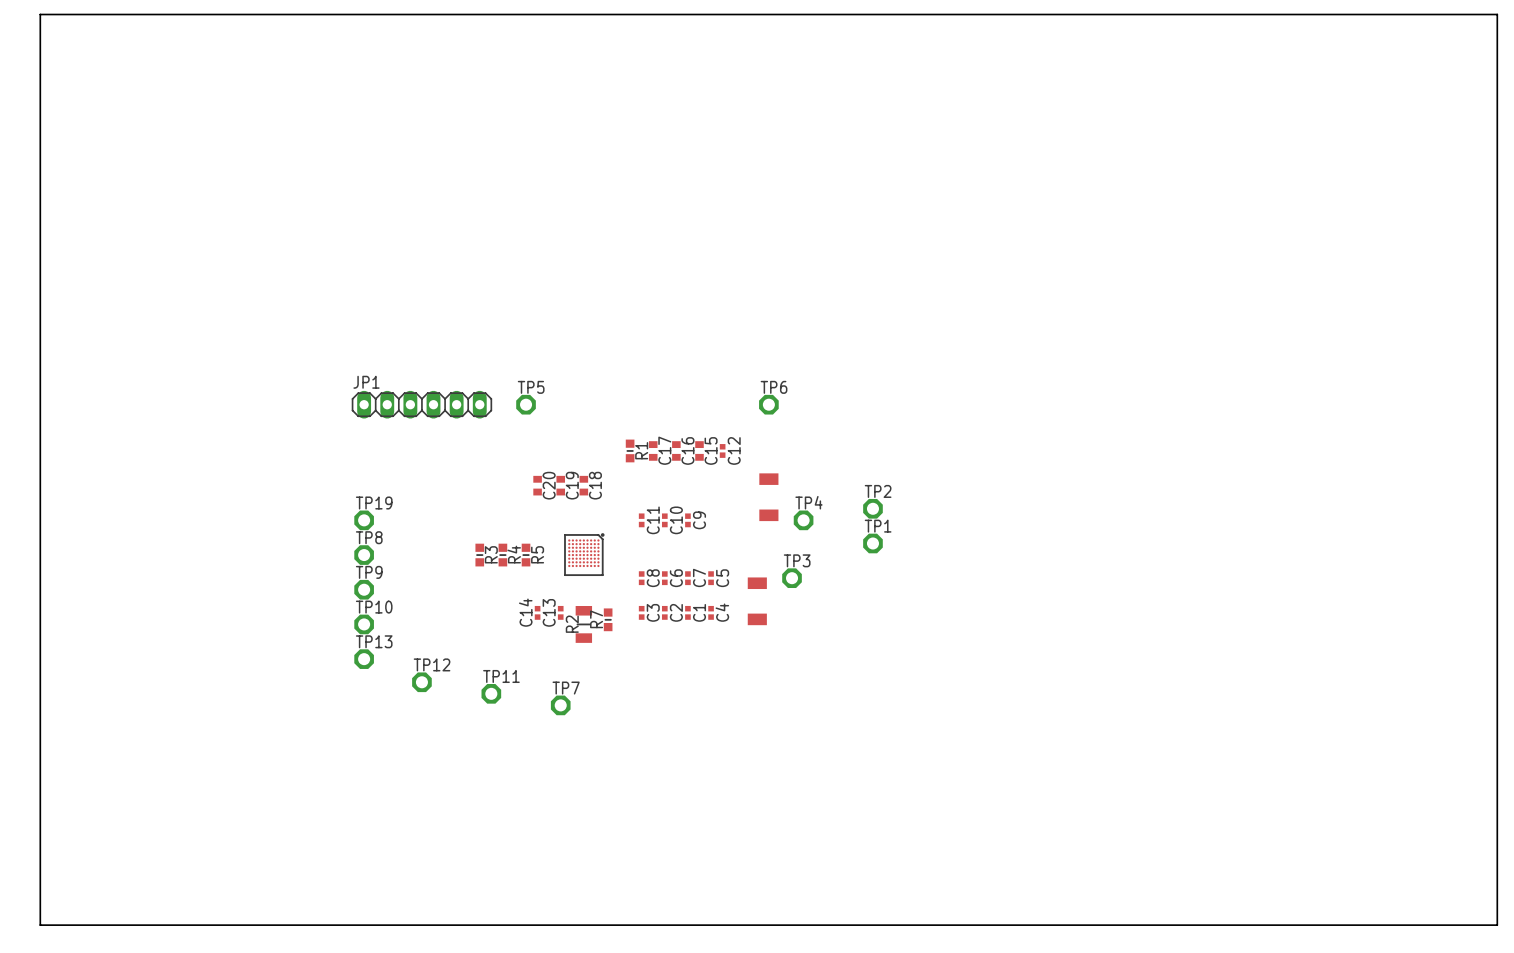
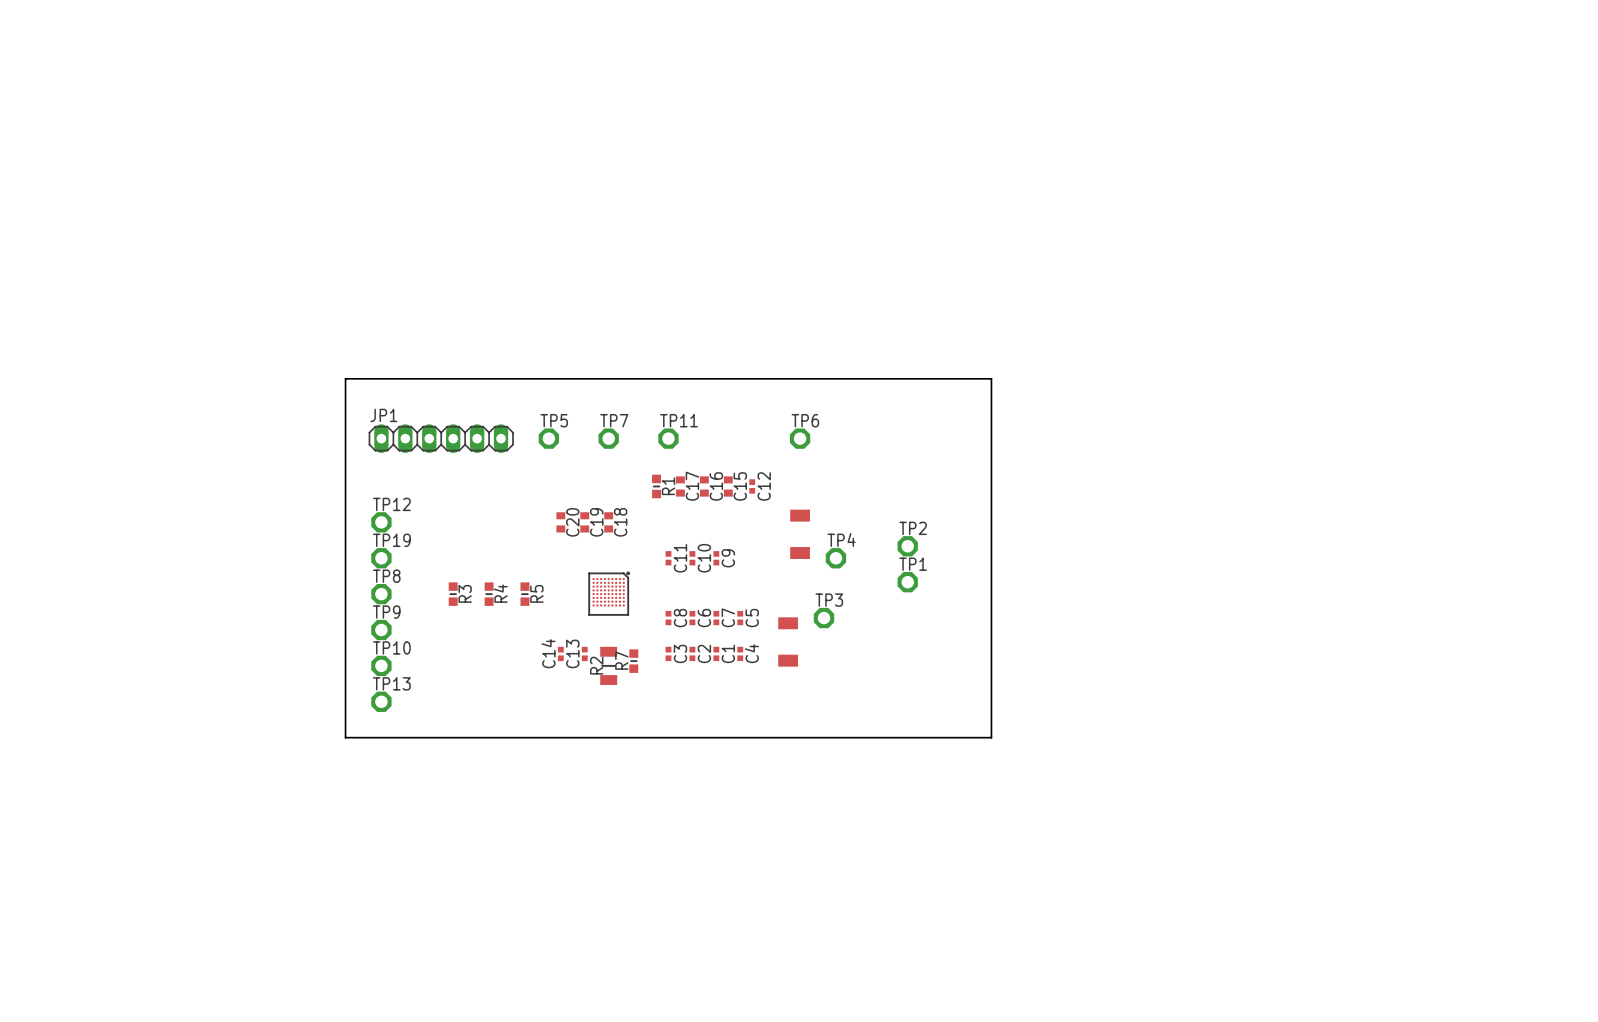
board edge: (40, 14) (1497, 14) (1497, 925) (40, 925) (40, 14) -> none
board edge: none -> (345, 378) (991, 378) (991, 737) (345, 737) (345, 378)
R4 name: R4 (514, 554) -> R5 (536, 593)
R4: none -> (489, 594)
R3 position: (479, 555) -> (453, 594)
R5: (526, 555) -> none
TP12 position: (421, 682) -> (381, 522)
TP11 position: (491, 693) -> (668, 438)
TP7 position: (560, 705) -> (608, 438)

